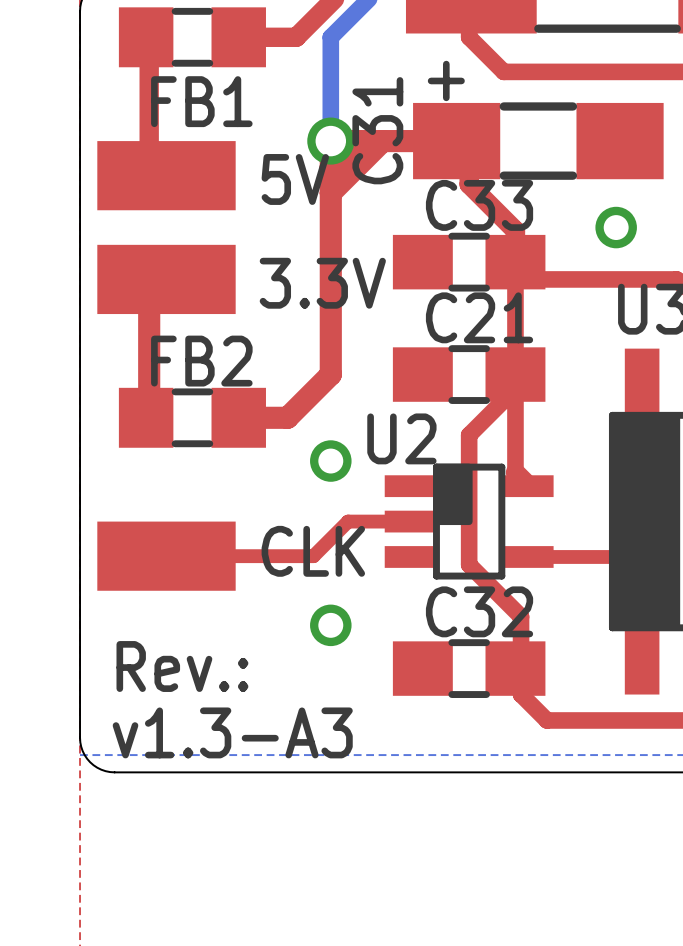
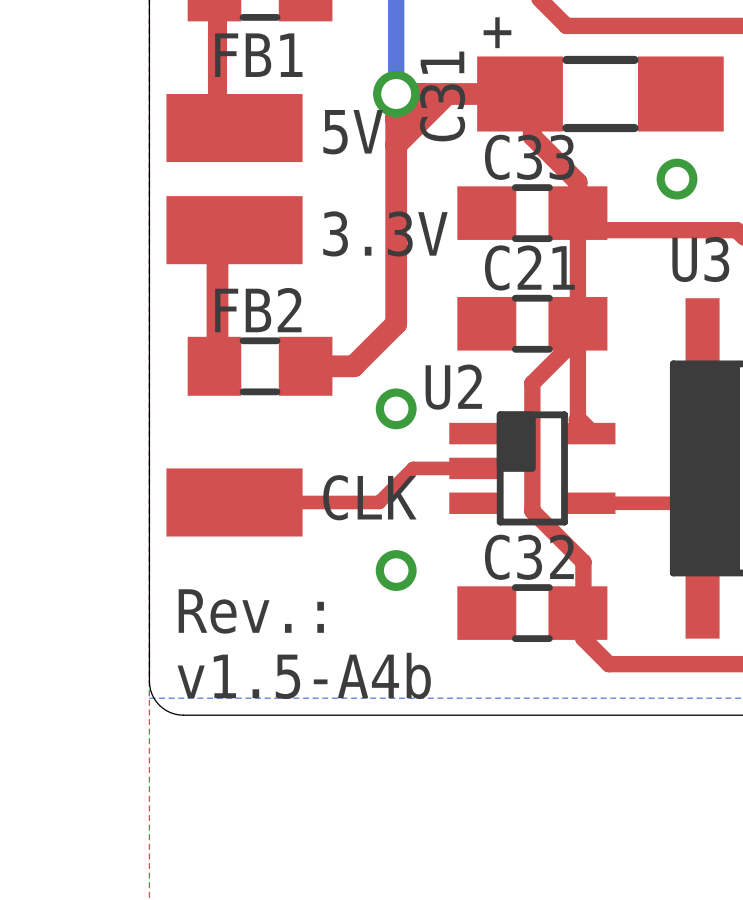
text: v1.3-A3 (232, 732) -> v1.5-A4b (304, 675)

